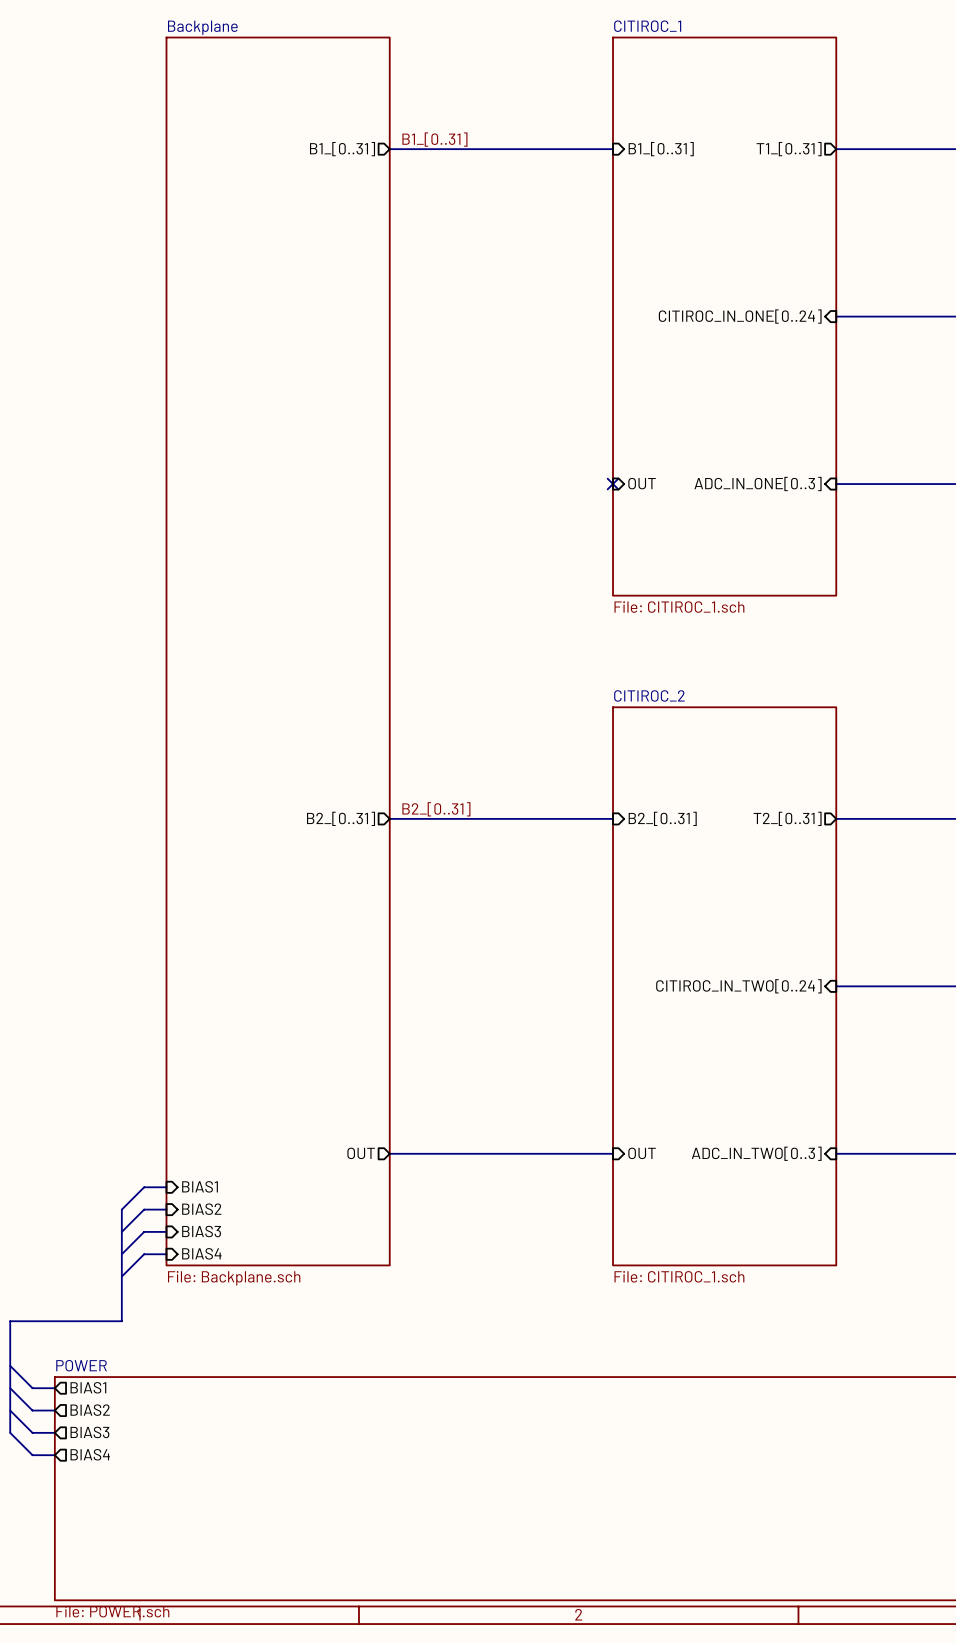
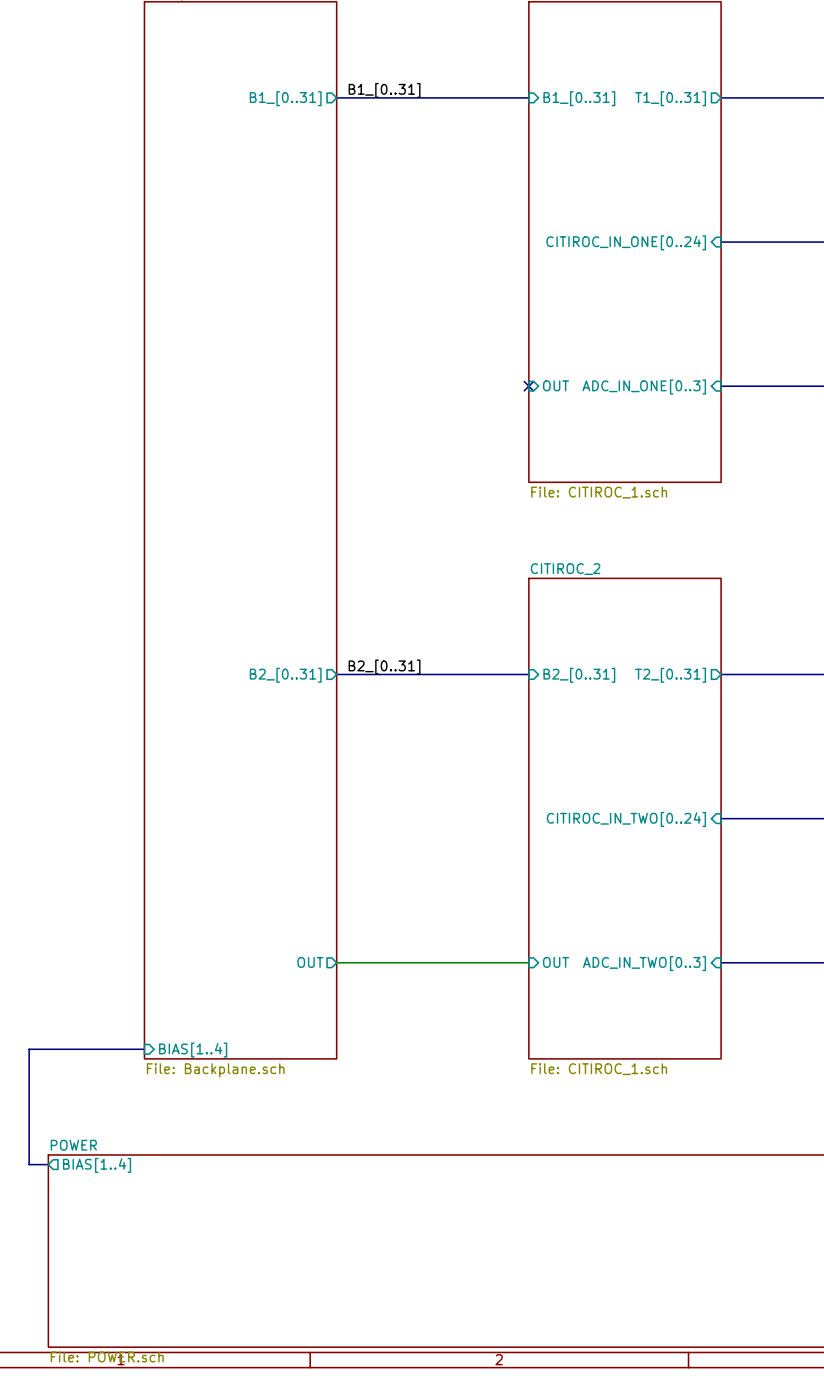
sheet pin: BIAS1 (200, 1186) -> none
wire: (166, 1187) (144, 1187) (121, 1209) -> none
bus: (121, 1209) (121, 1321) (10, 1321) (10, 1432) -> none
wire: (166, 1209) (144, 1209) (121, 1231) -> none
sheet pin: BIAS2 (201, 1209) -> none
wire: (166, 1231) (144, 1231) (121, 1254) -> none
sheet pin: BIAS3 (201, 1231) -> none
sheet pin: BIAS4 (201, 1253) -> BIAS[1..4] (193, 1050)
bus: none -> (144, 1049) (29, 1049) (29, 1164) (48, 1164)
wire: (166, 1254) (144, 1254) (121, 1276) -> none
wire: (10, 1365) (32, 1388) (54, 1388) -> none
sheet pin: BIAS1 (88, 1387) -> BIAS[1..4] (97, 1165)
wire: (10, 1388) (32, 1410) (54, 1410) -> none
wire: (10, 1410) (32, 1432) (54, 1432) -> none
sheet pin: BIAS2 (90, 1410) -> none
wire: (10, 1432) (32, 1455) (54, 1455) -> none
sheet pin: BIAS3 (89, 1432) -> none
sheet pin: BIAS4 (90, 1454) -> none

